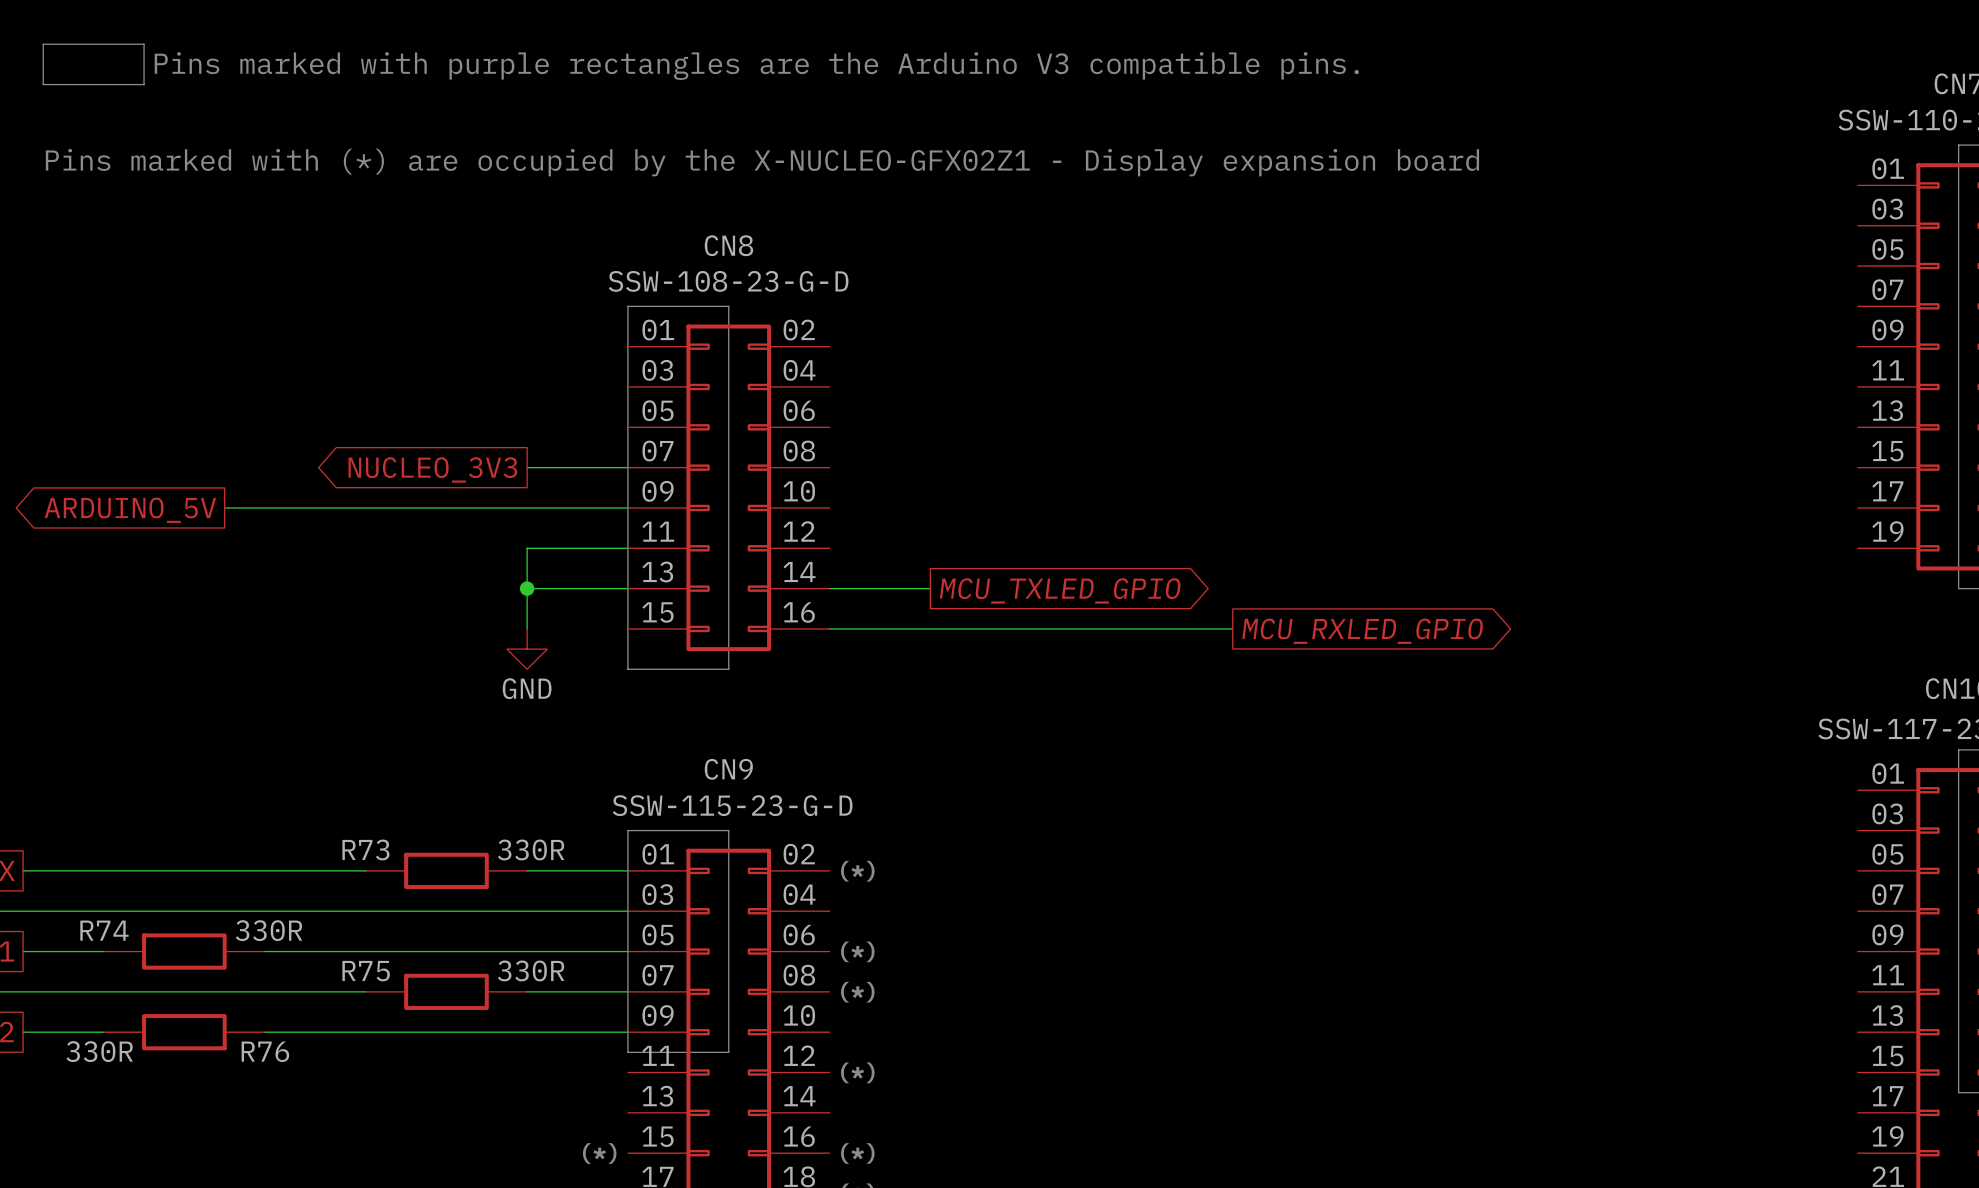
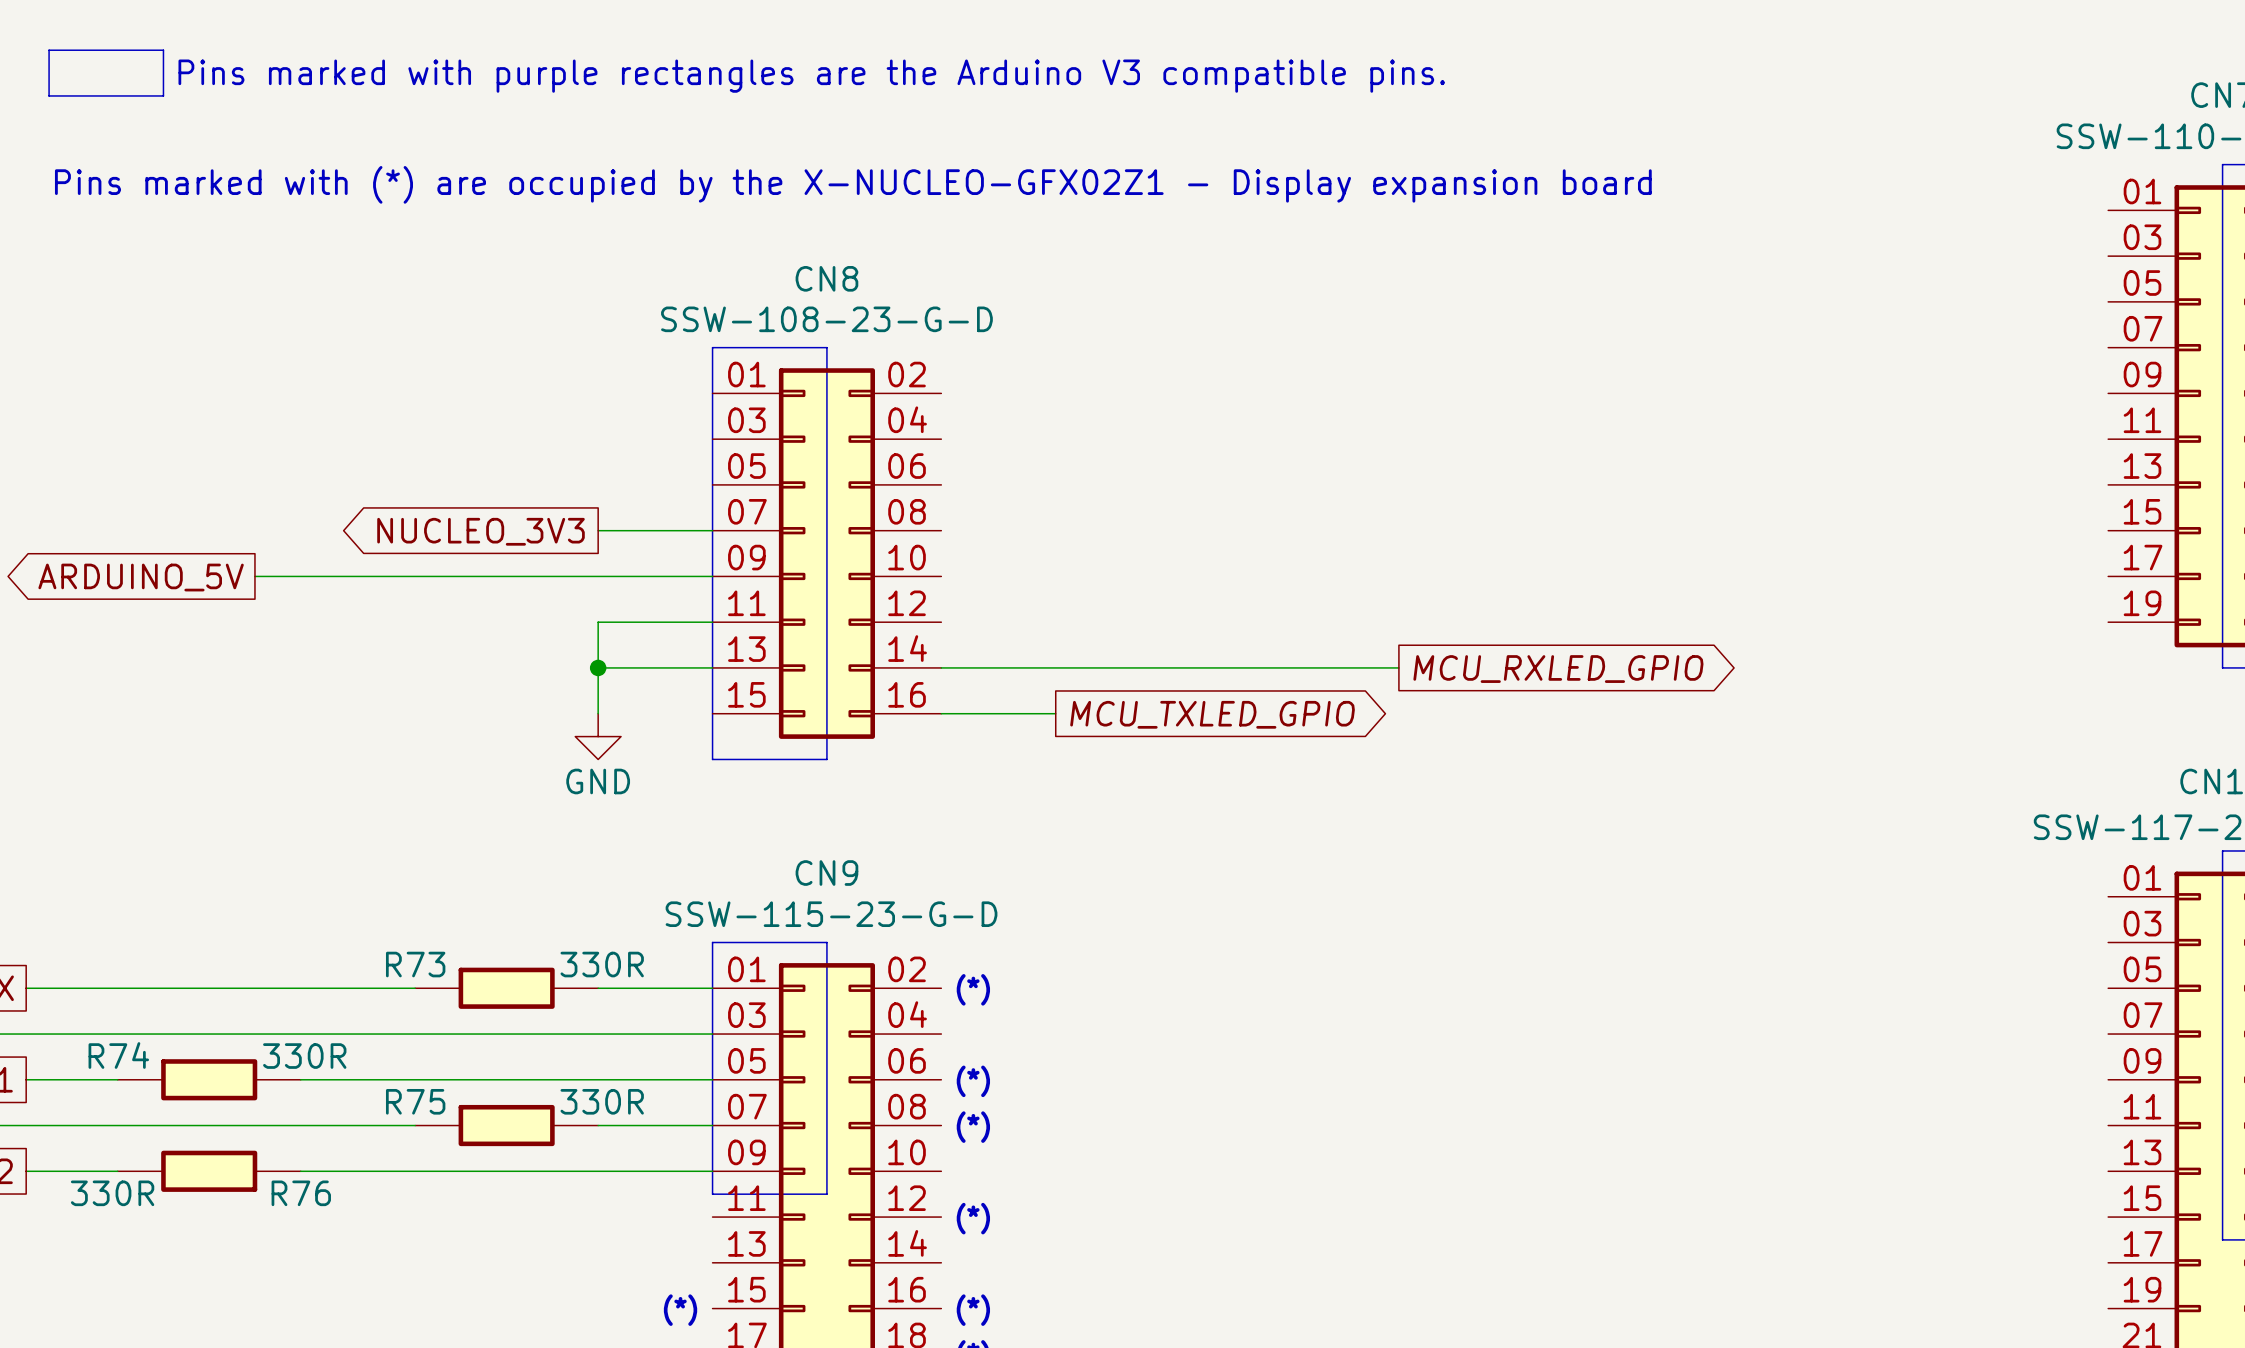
global label position: MCU_TXLED_GPIO (1060, 590) -> MCU_TXLED_GPIO (1212, 714)
wire: (930, 628) (1232, 628) -> (1055, 667) (1398, 667)
global label position: MCU_RXLED_GPIO (1362, 631) -> MCU_RXLED_GPIO (1558, 669)

